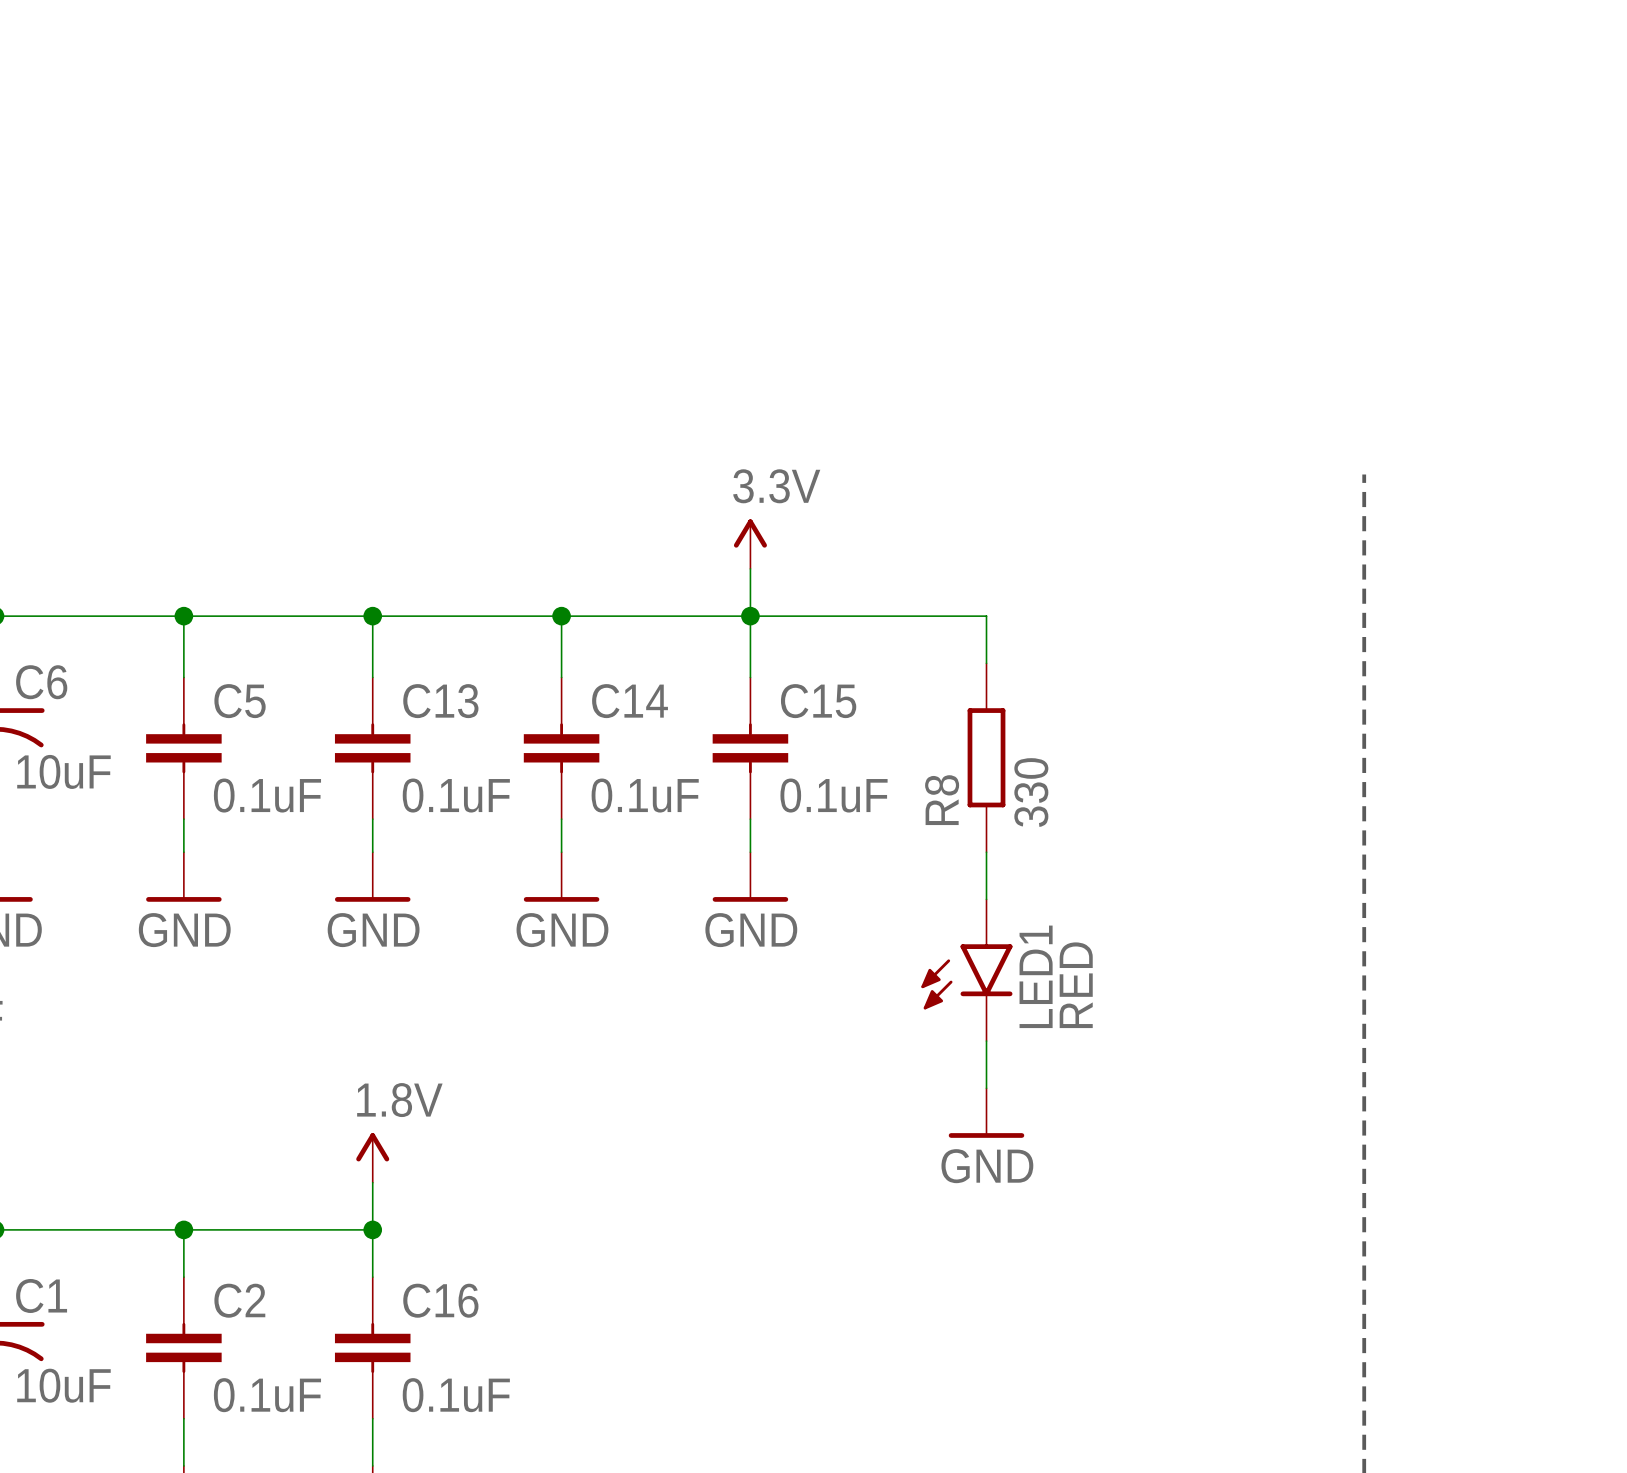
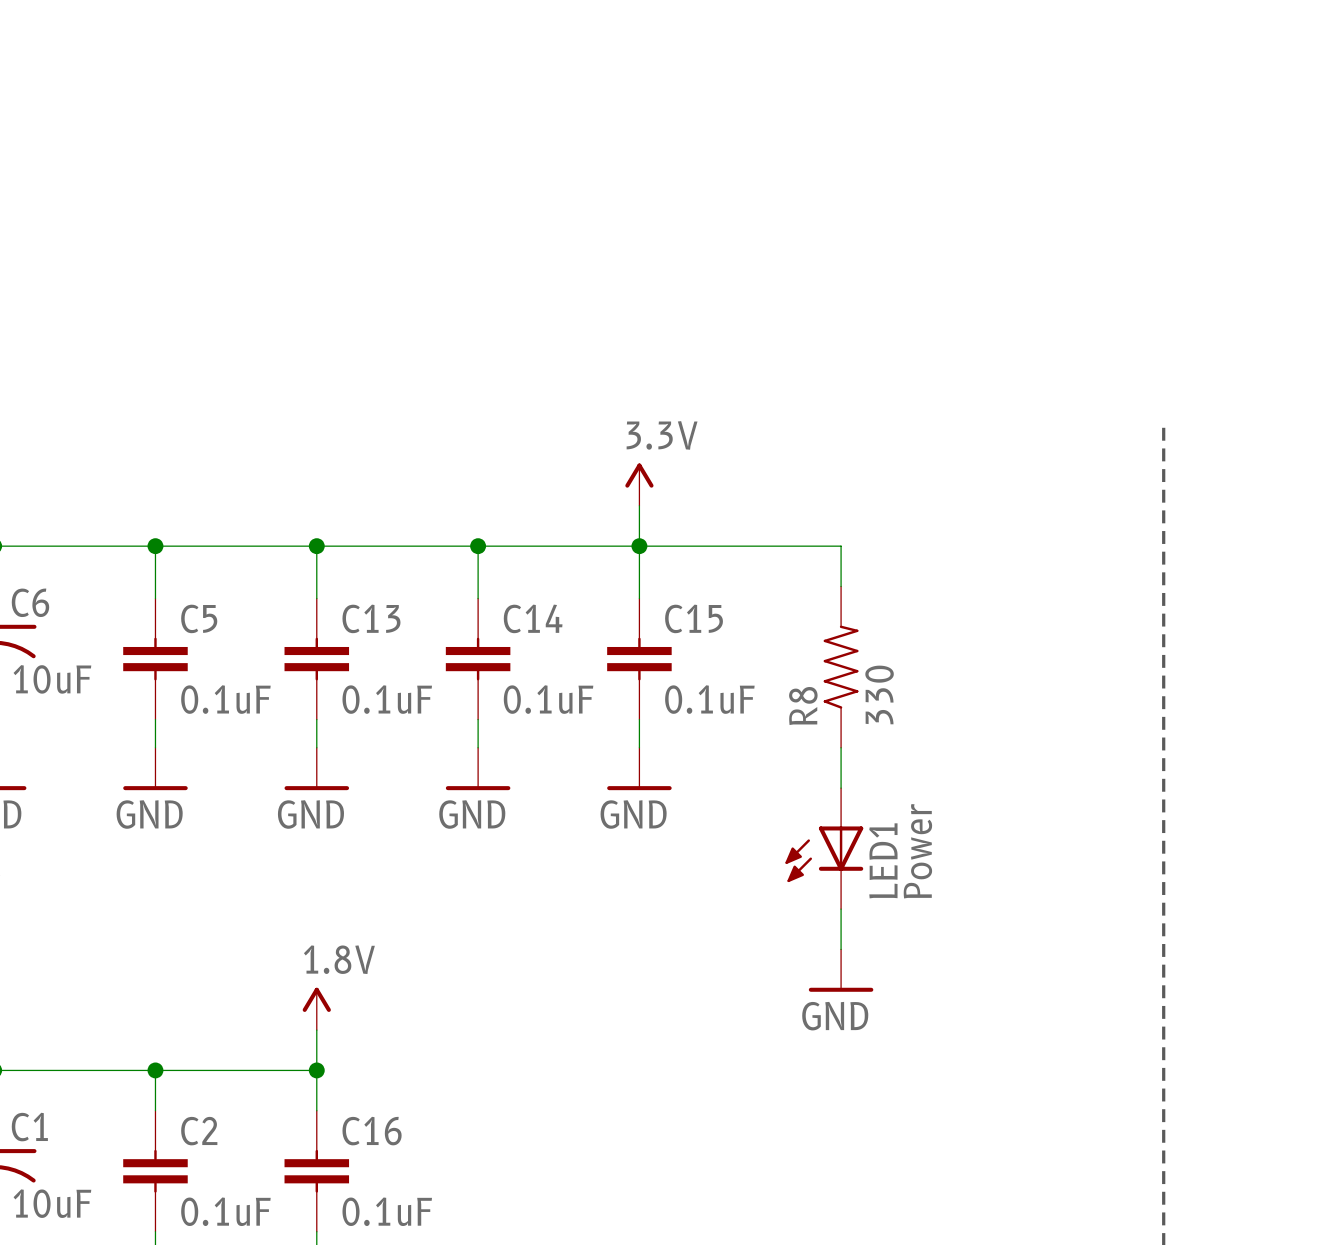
R8 symbol: [967, 663, 1006, 853] -> [823, 586, 859, 748]
LED1 symbol: [921, 899, 1013, 1042] -> [785, 788, 864, 910]
LED1 value: RED (1076, 985) -> Power (917, 851)

